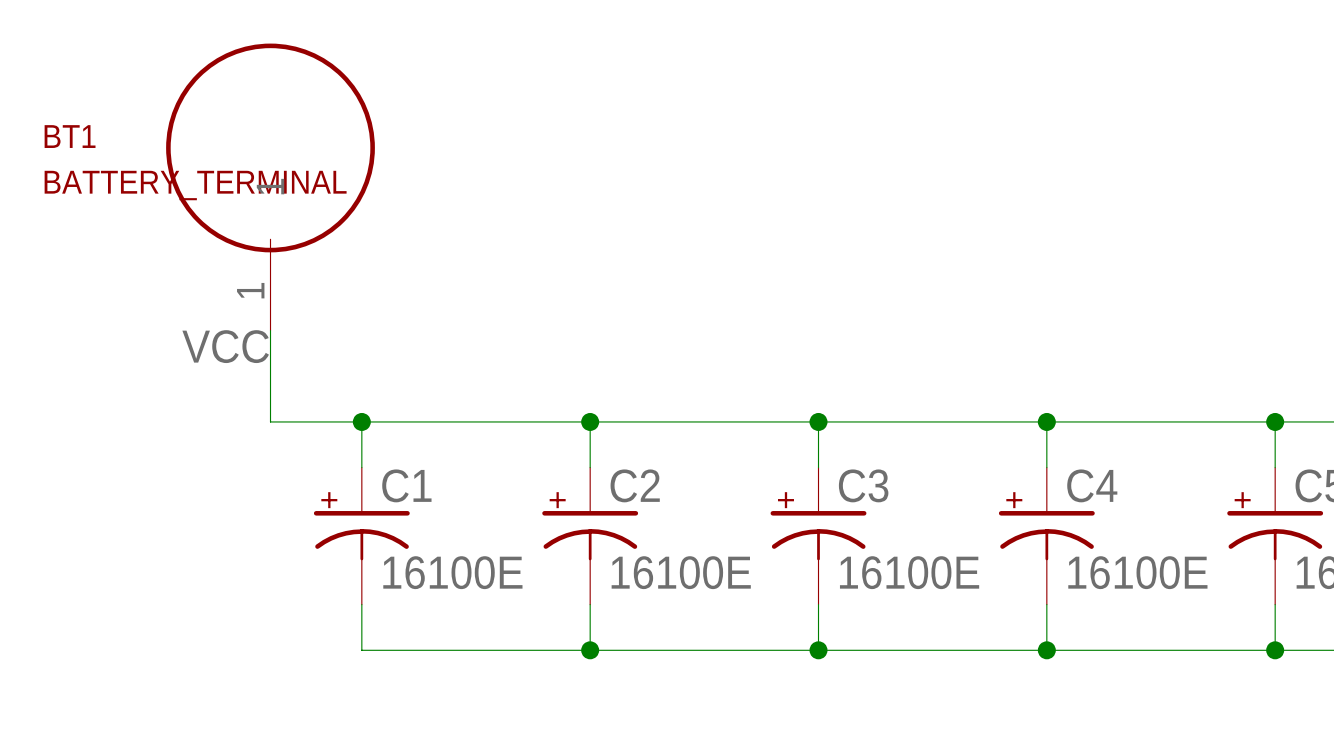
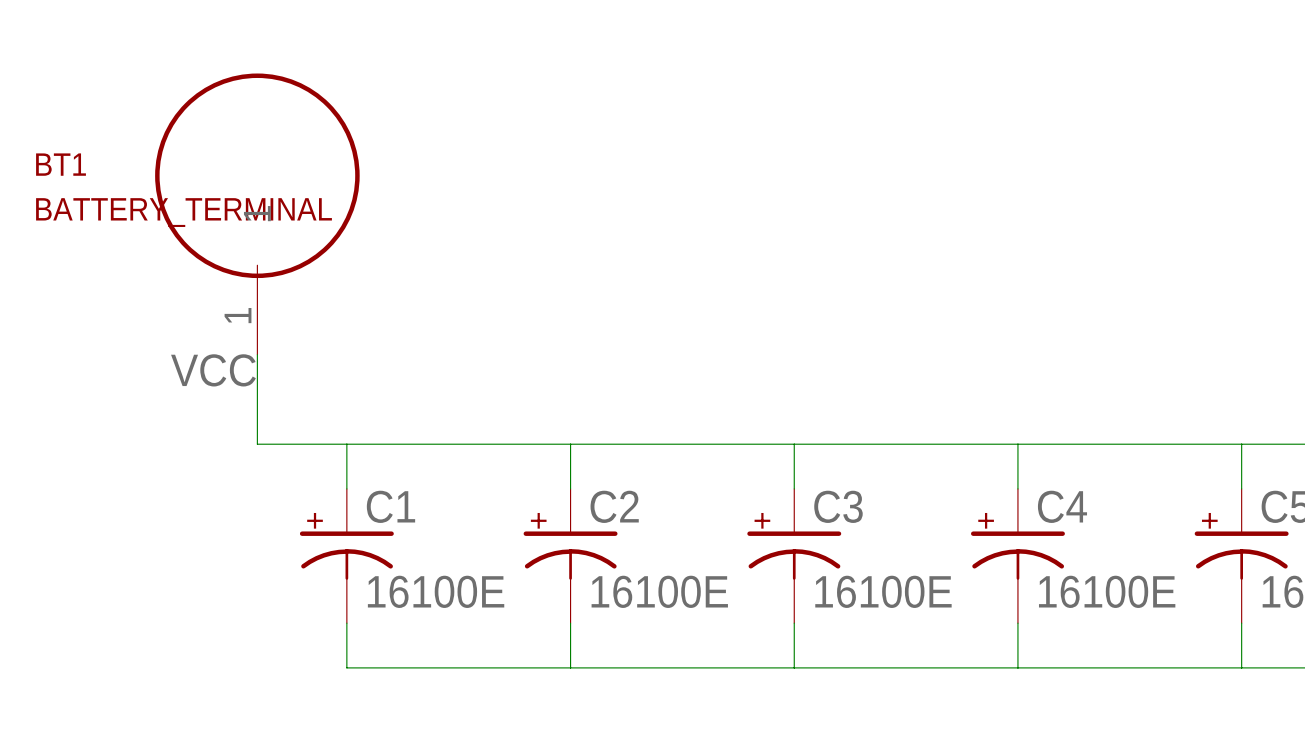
junction: (361, 421) -> none
junction: (590, 421) -> none
junction: (818, 421) -> none
junction: (1046, 421) -> none
junction: (1275, 421) -> none
junction: (590, 650) -> none
junction: (818, 650) -> none
junction: (1046, 650) -> none
junction: (1275, 650) -> none

